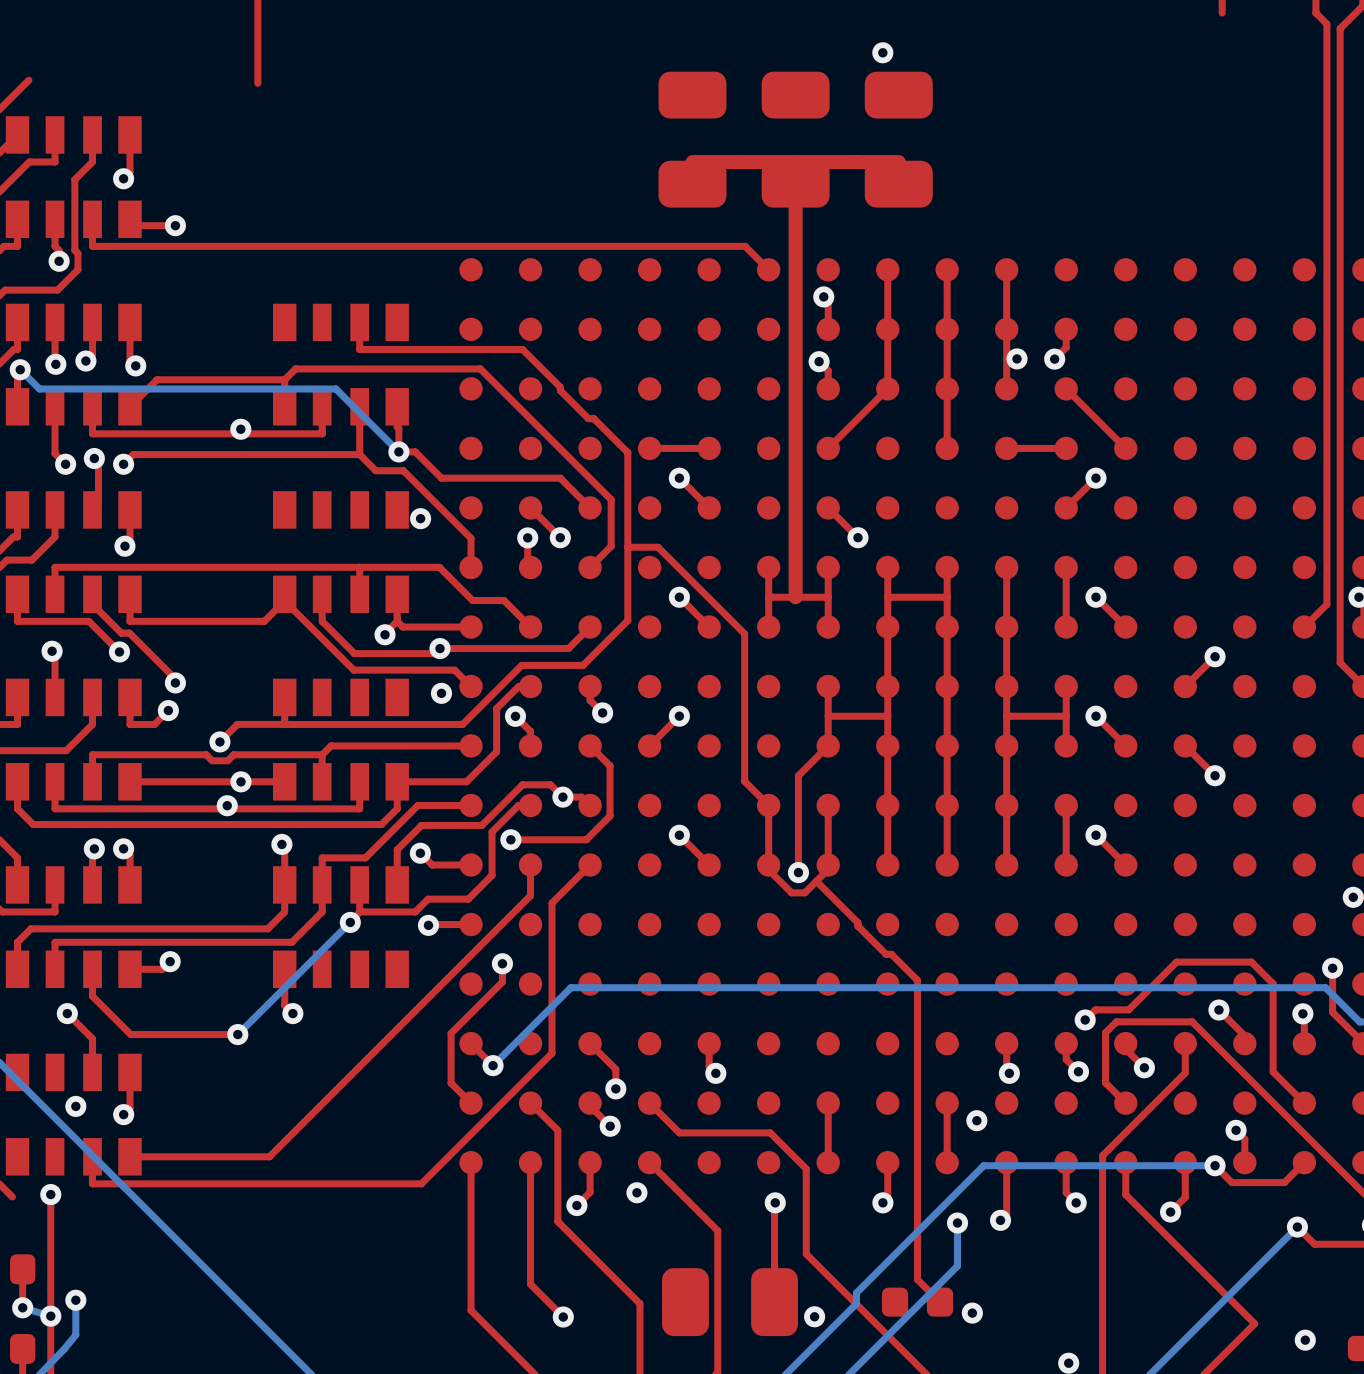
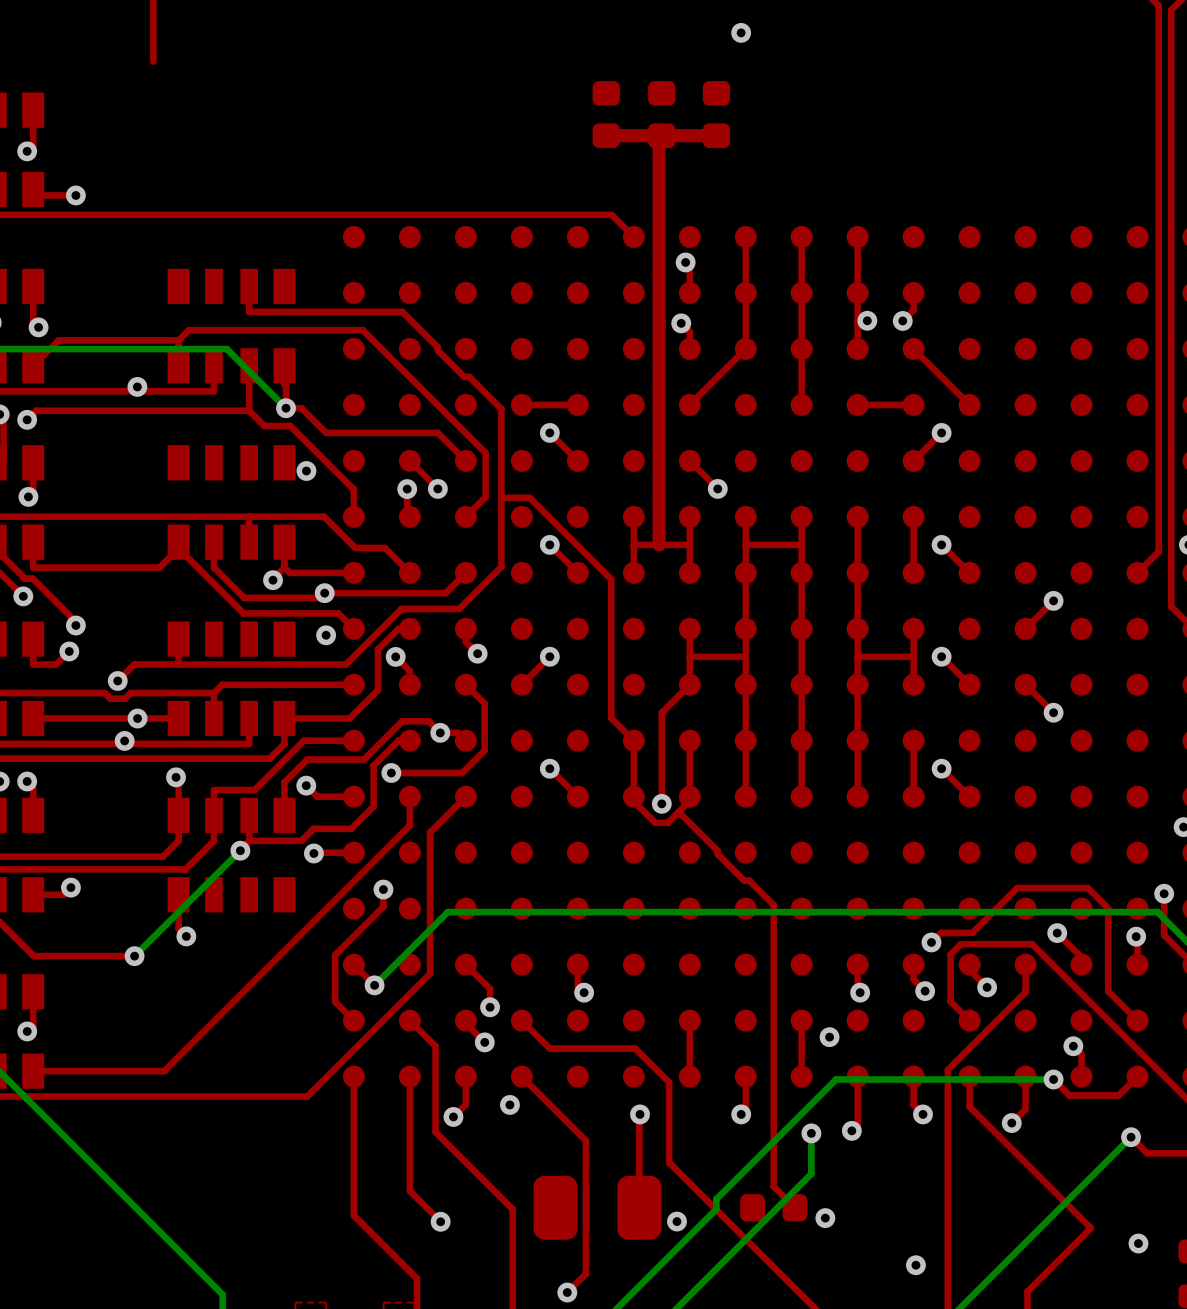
part footprint: [761, 71, 830, 208] -> [648, 81, 676, 149]
part: (692, 139) -> none
part: none -> (606, 114)
part: none -> (716, 114)
part: (898, 139) -> none
top track: (739, 162) (692, 162) -> none
top track: (898, 162) (856, 162) -> none

